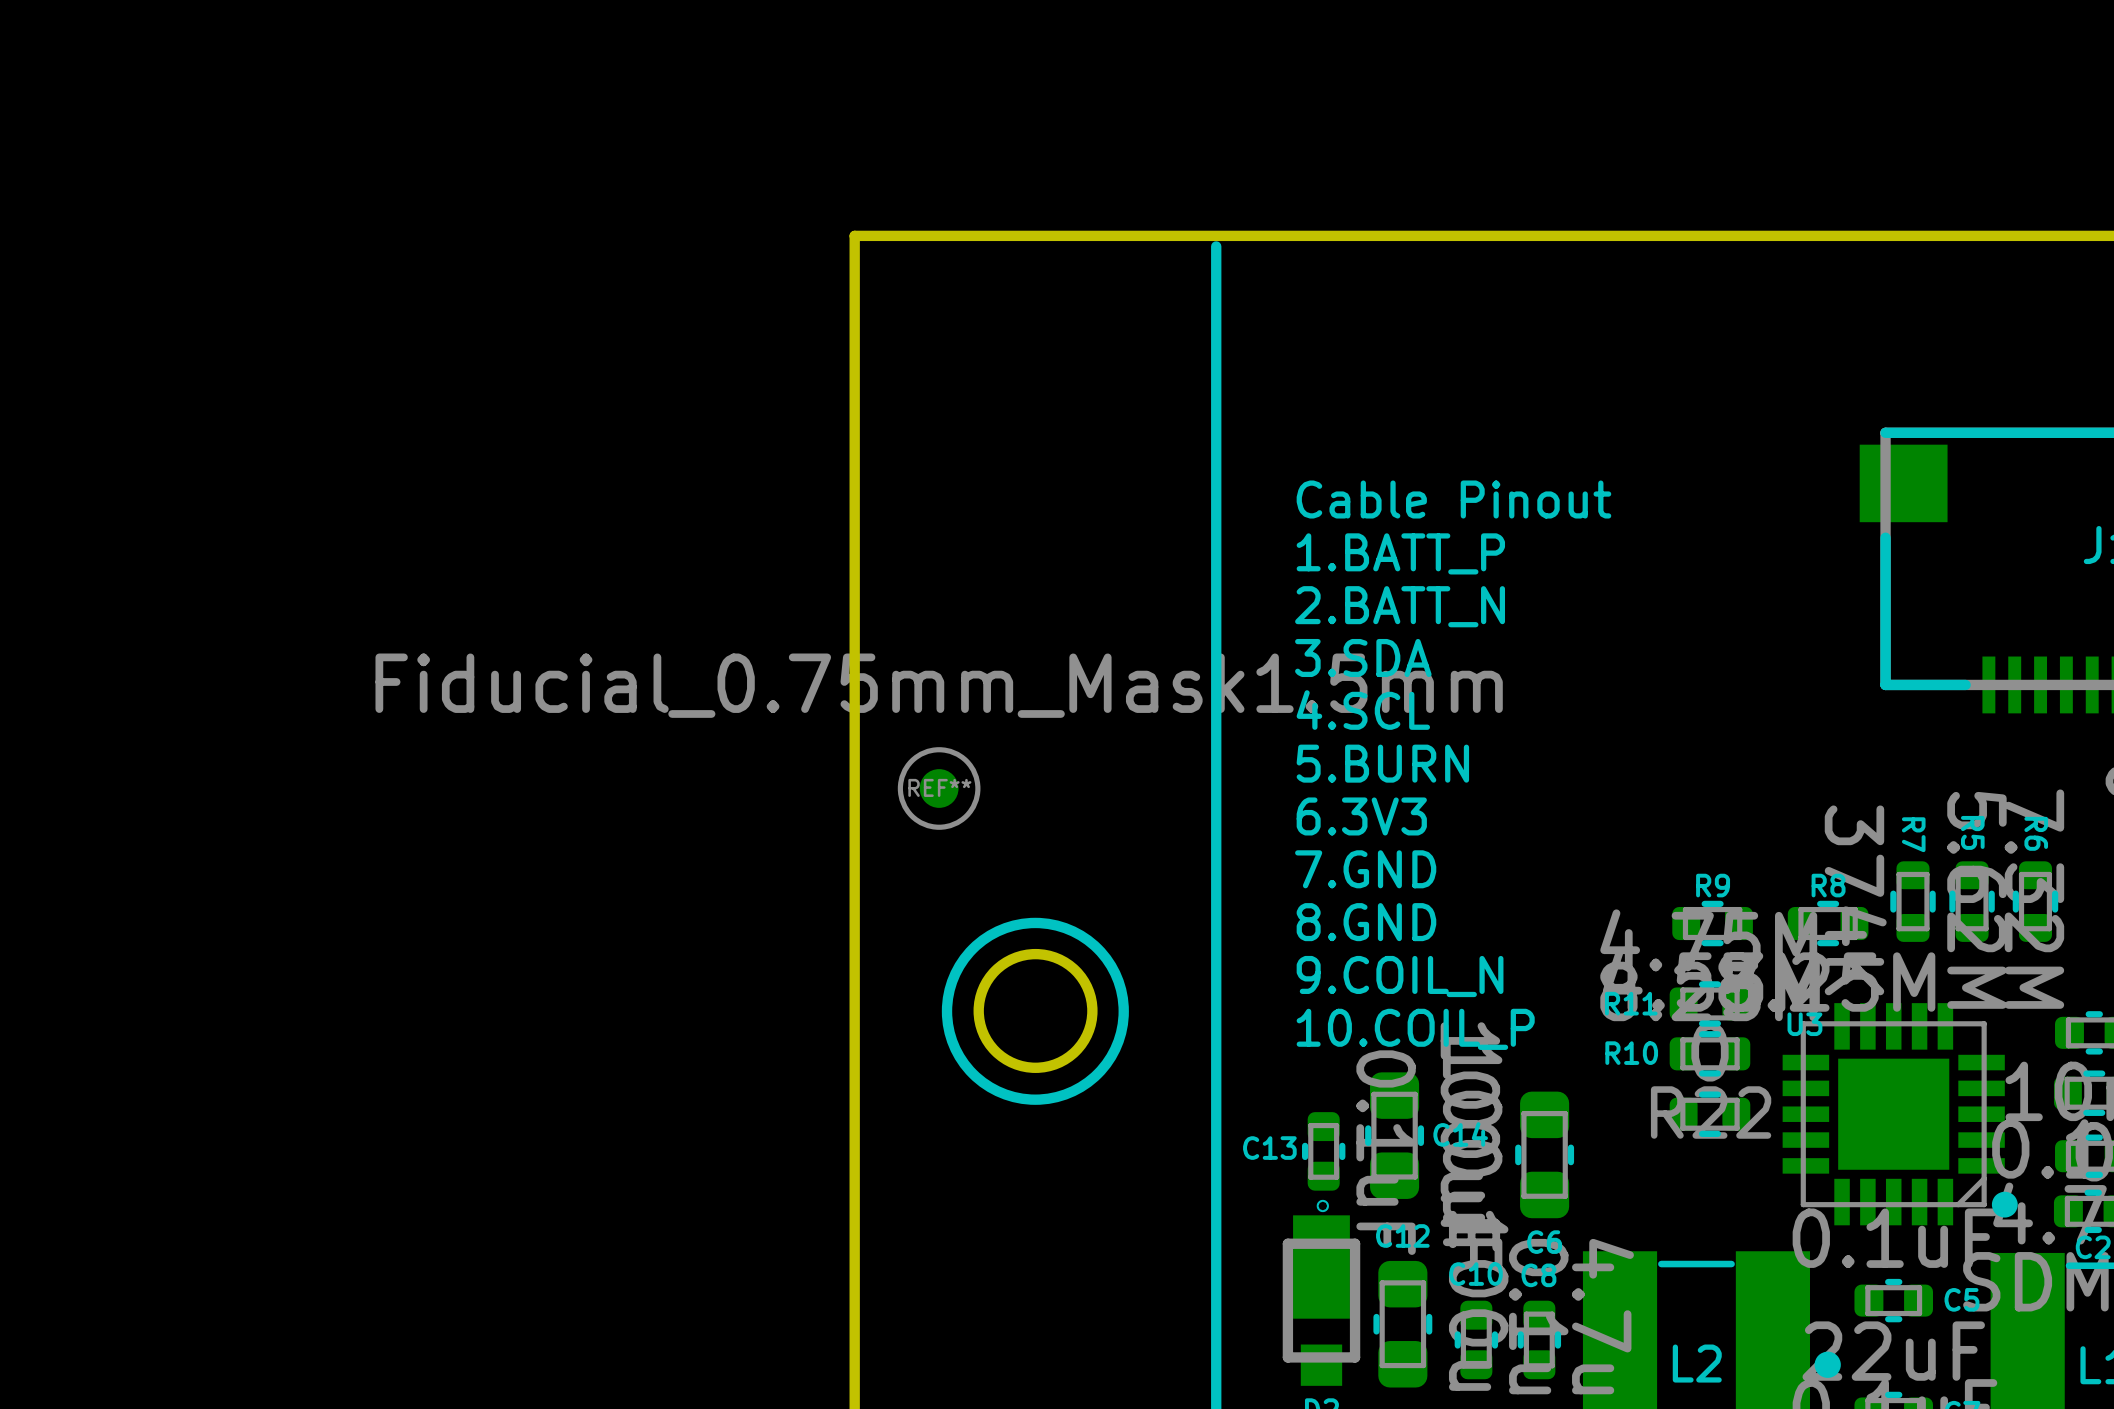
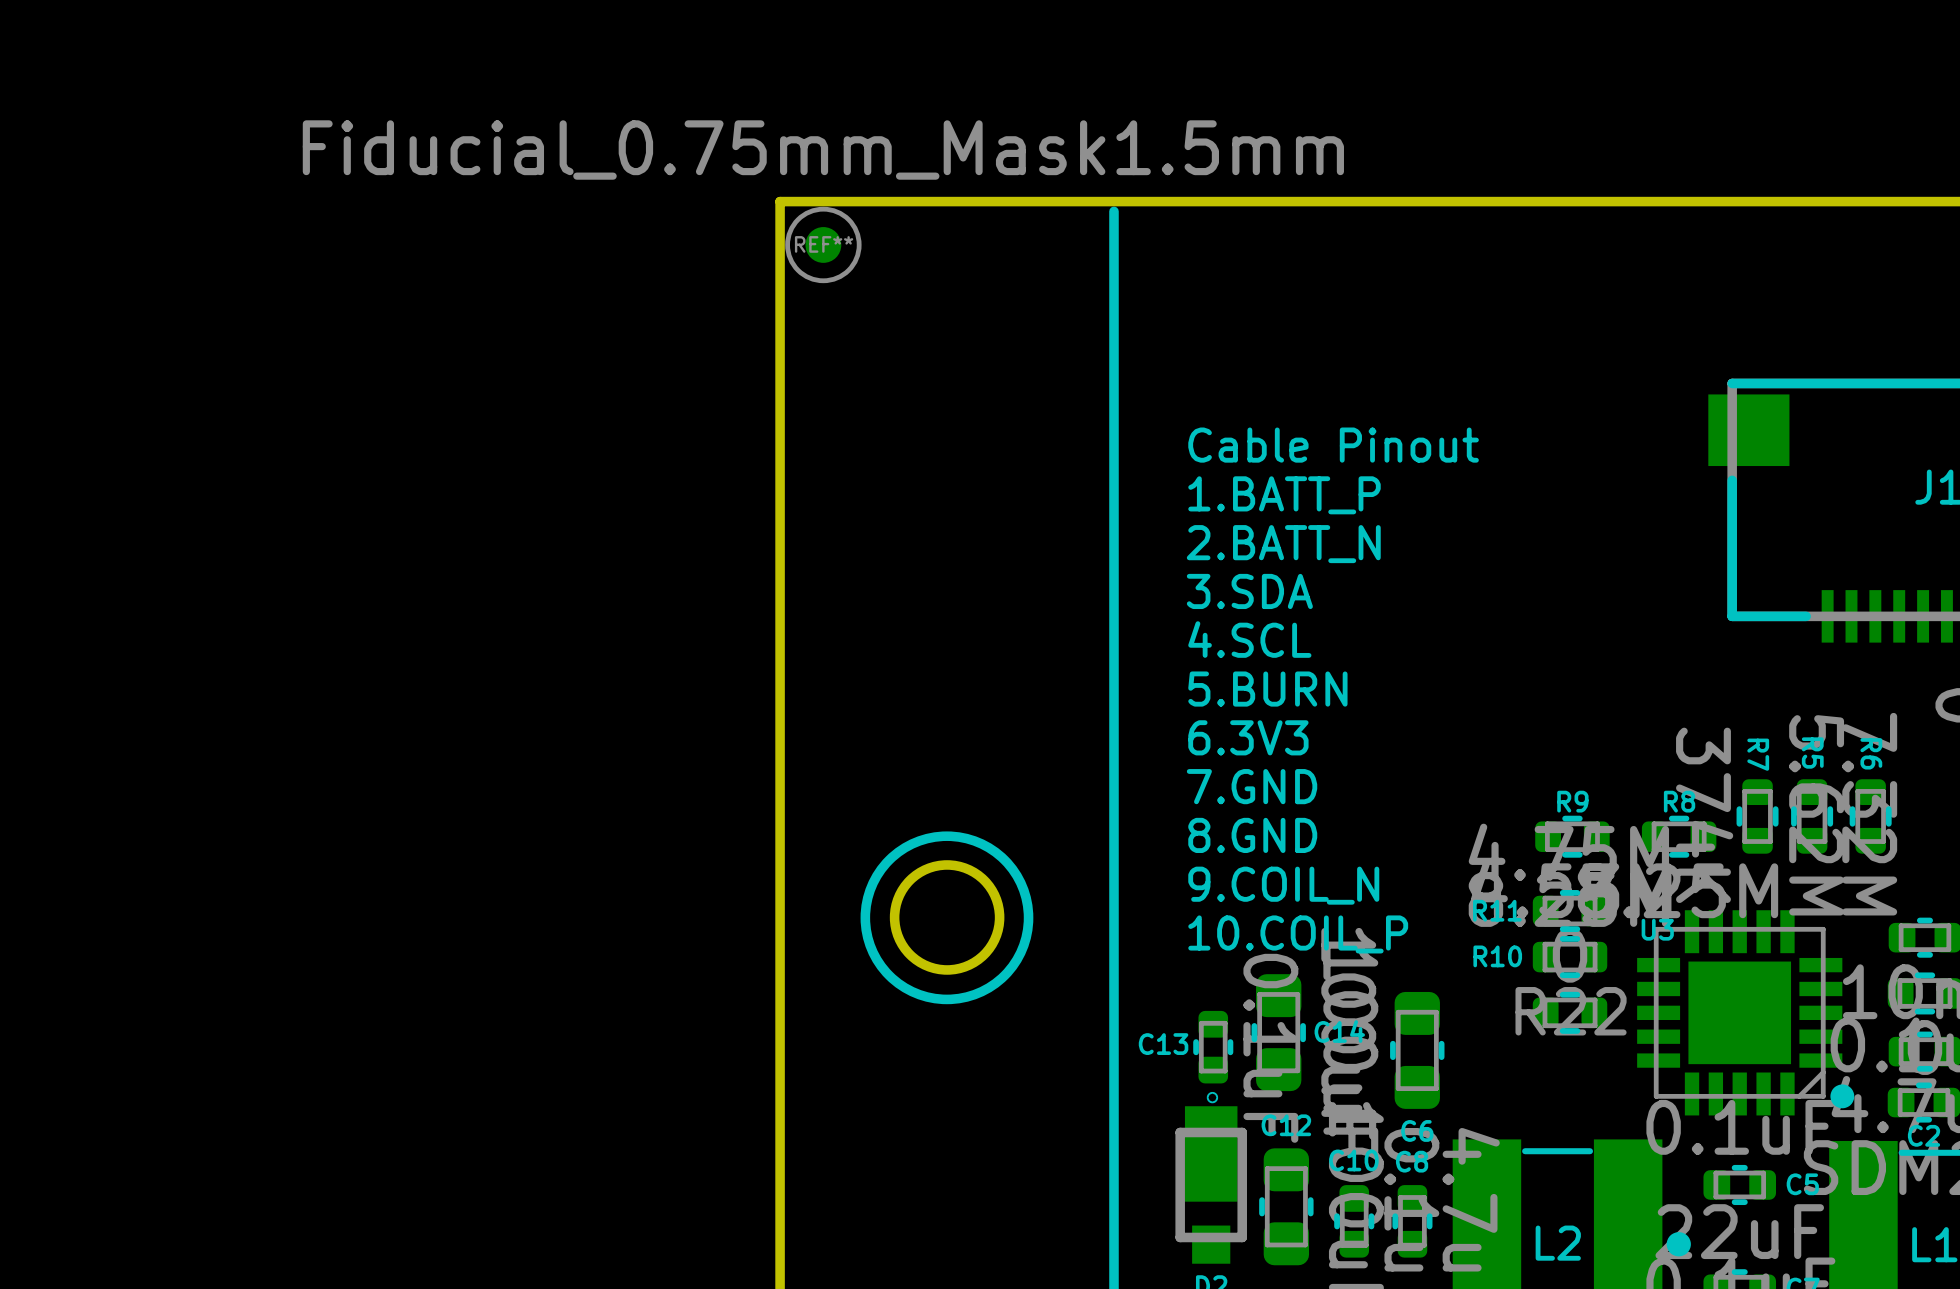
REF** position: (939, 788) -> (823, 244)

